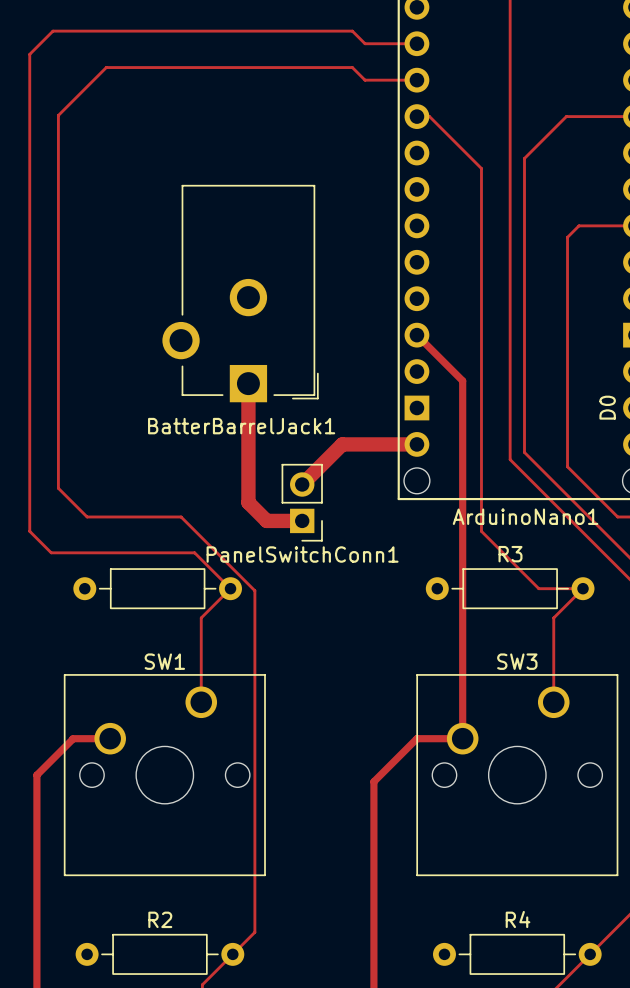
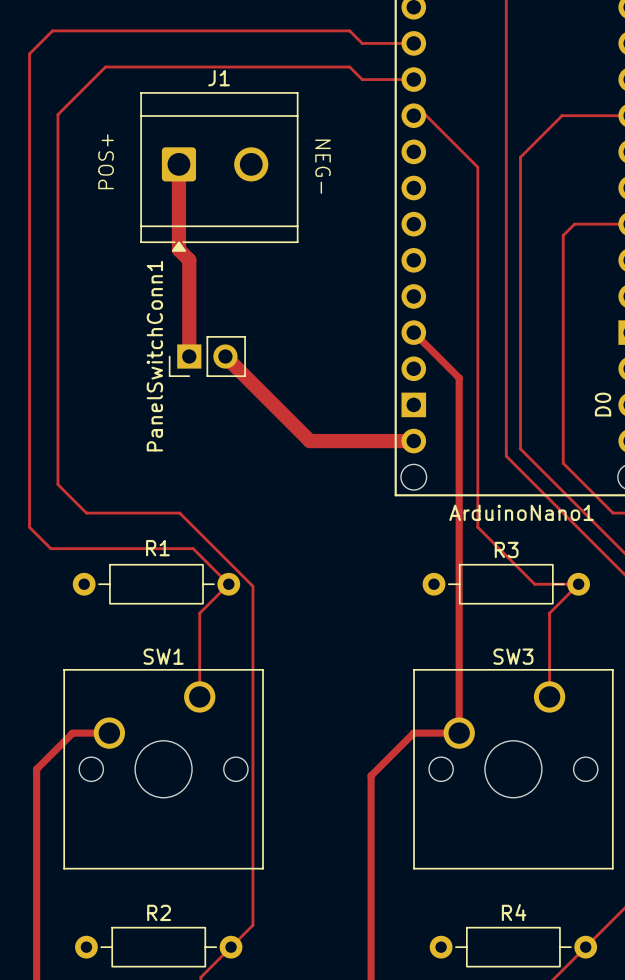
text: none -> POS+ (106, 161)
track: none -> (178, 164) (178, 249) (189, 260) (189, 356)
text: none -> NEG- (323, 166)
J1: none -> (219, 171)
BatterBarrelJack1: (240, 293) -> none
track: (241, 390) (248, 383) (248, 502) (266, 520) (302, 520) -> none
track: (342, 444) (302, 484) -> (339, 441) (309, 441) (225, 356)
PanelSwitchConn1 rotation: 0° (302, 502) -> 90° clockwise (207, 356)
PanelSwitchConn1 position: (302, 502) -> (207, 356)
text: none -> R1 (157, 548)

